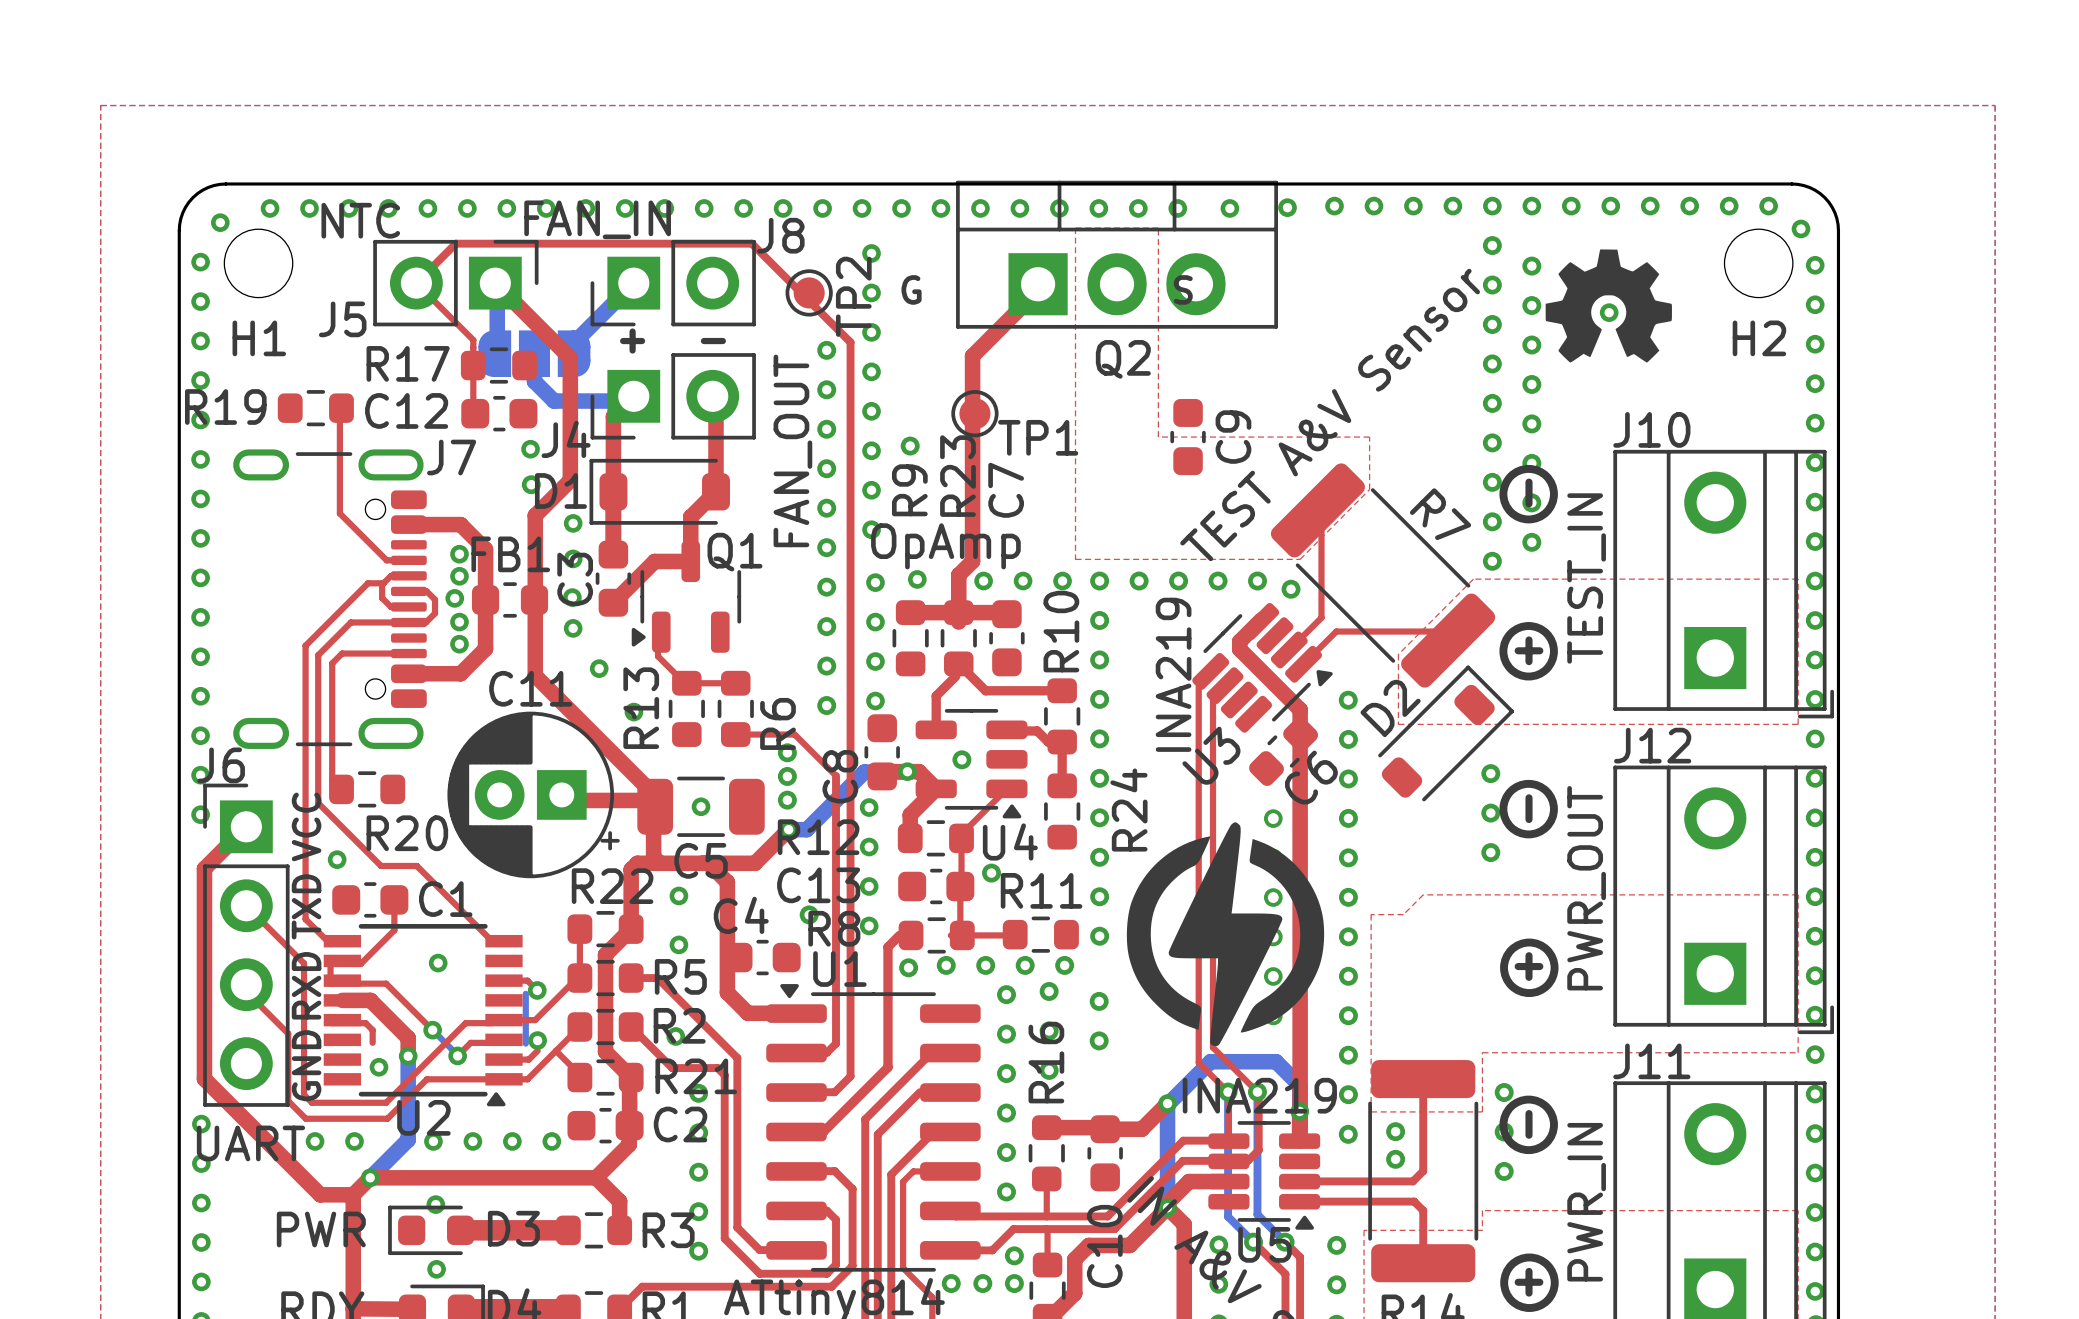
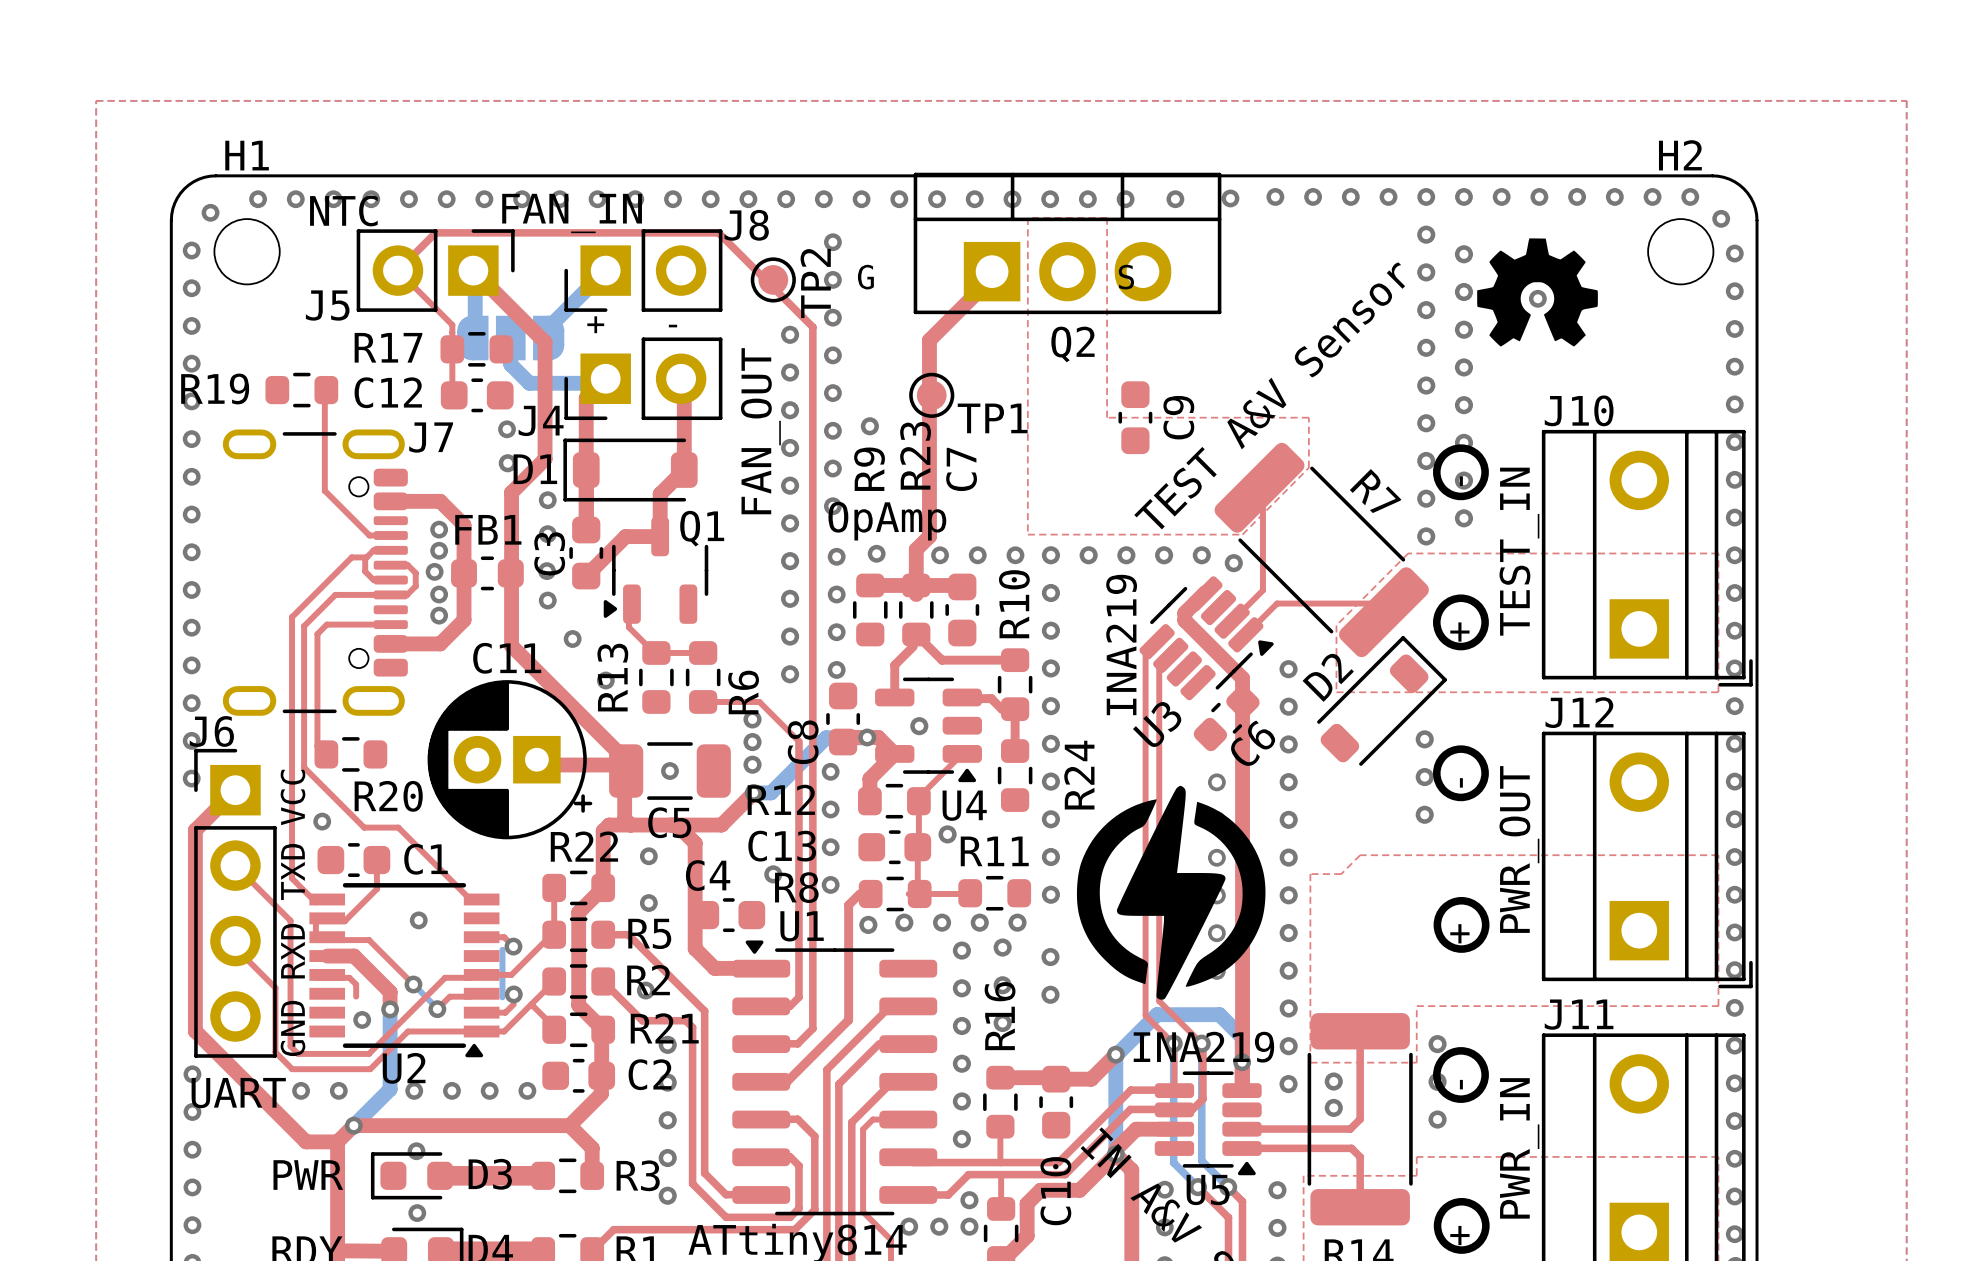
H1 name position: H1 (259, 338) -> H1 (247, 155)
H2 name position: H2 (1759, 338) -> H2 (1680, 155)

